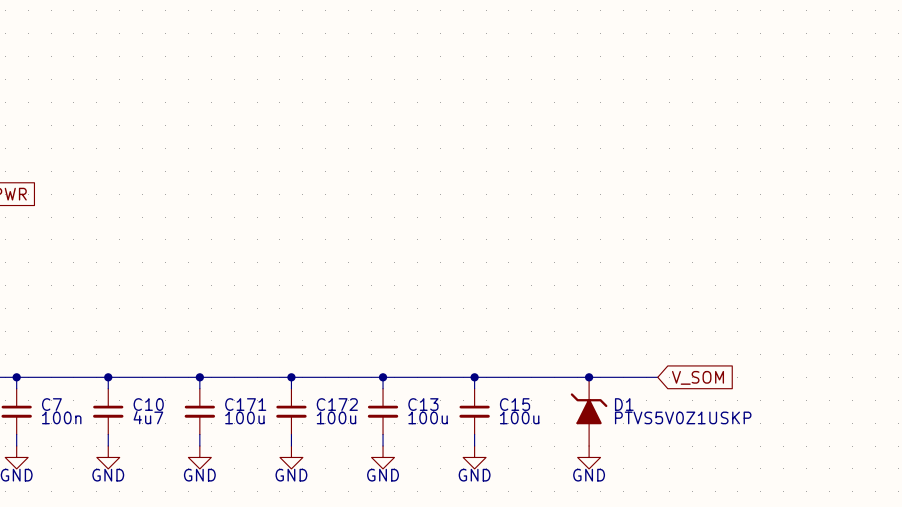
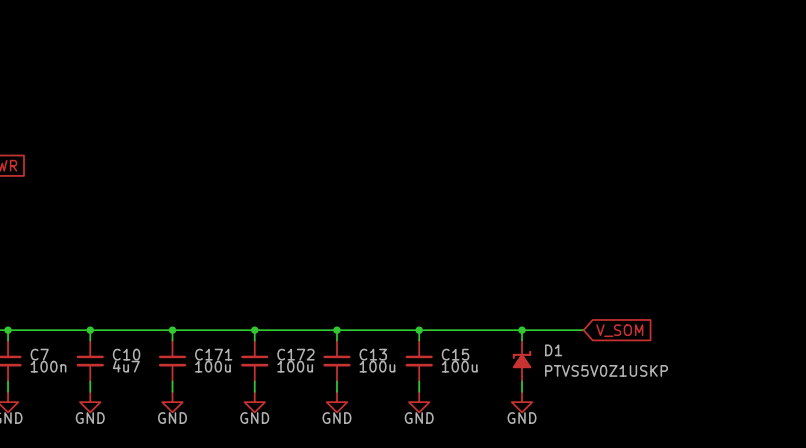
D1 symbol: [570, 377, 608, 447] -> [512, 340, 532, 382]

